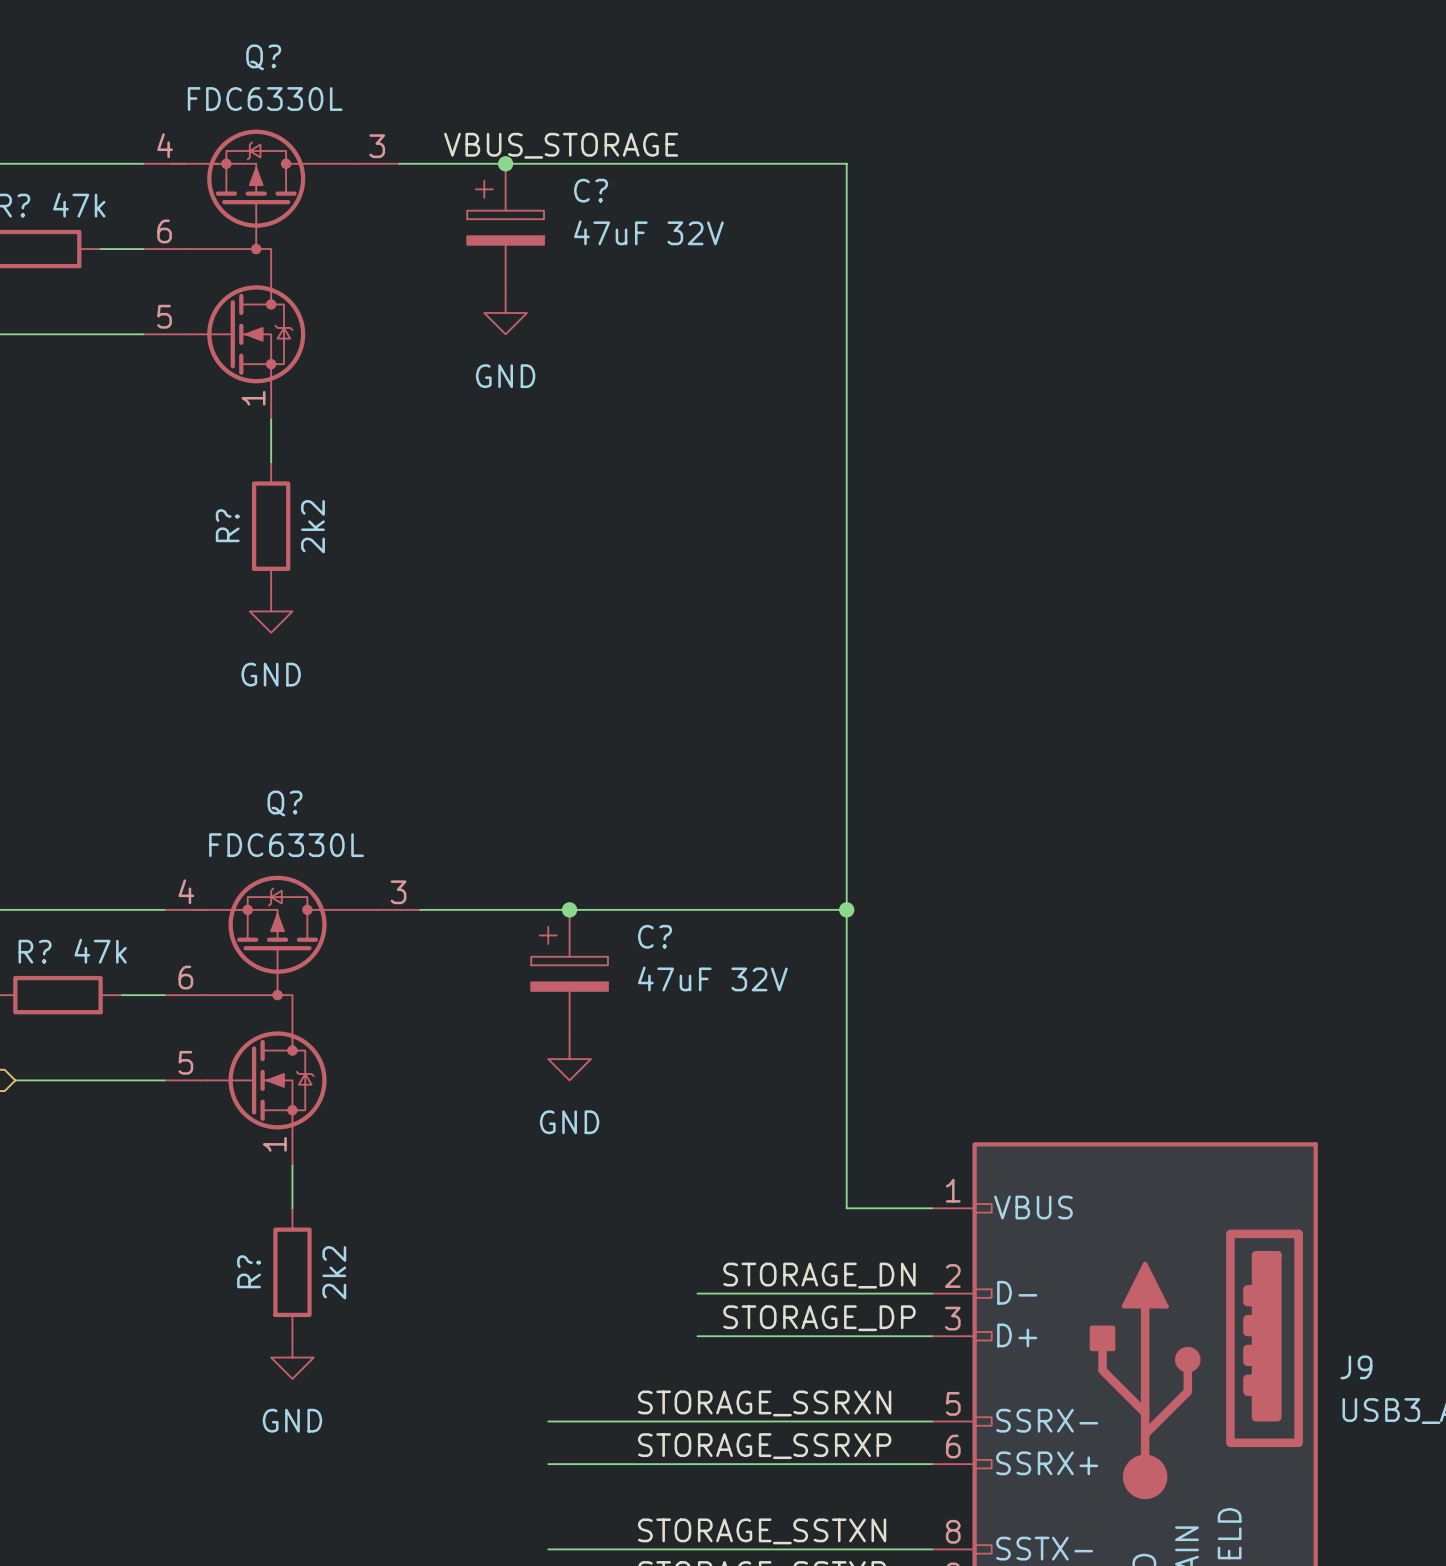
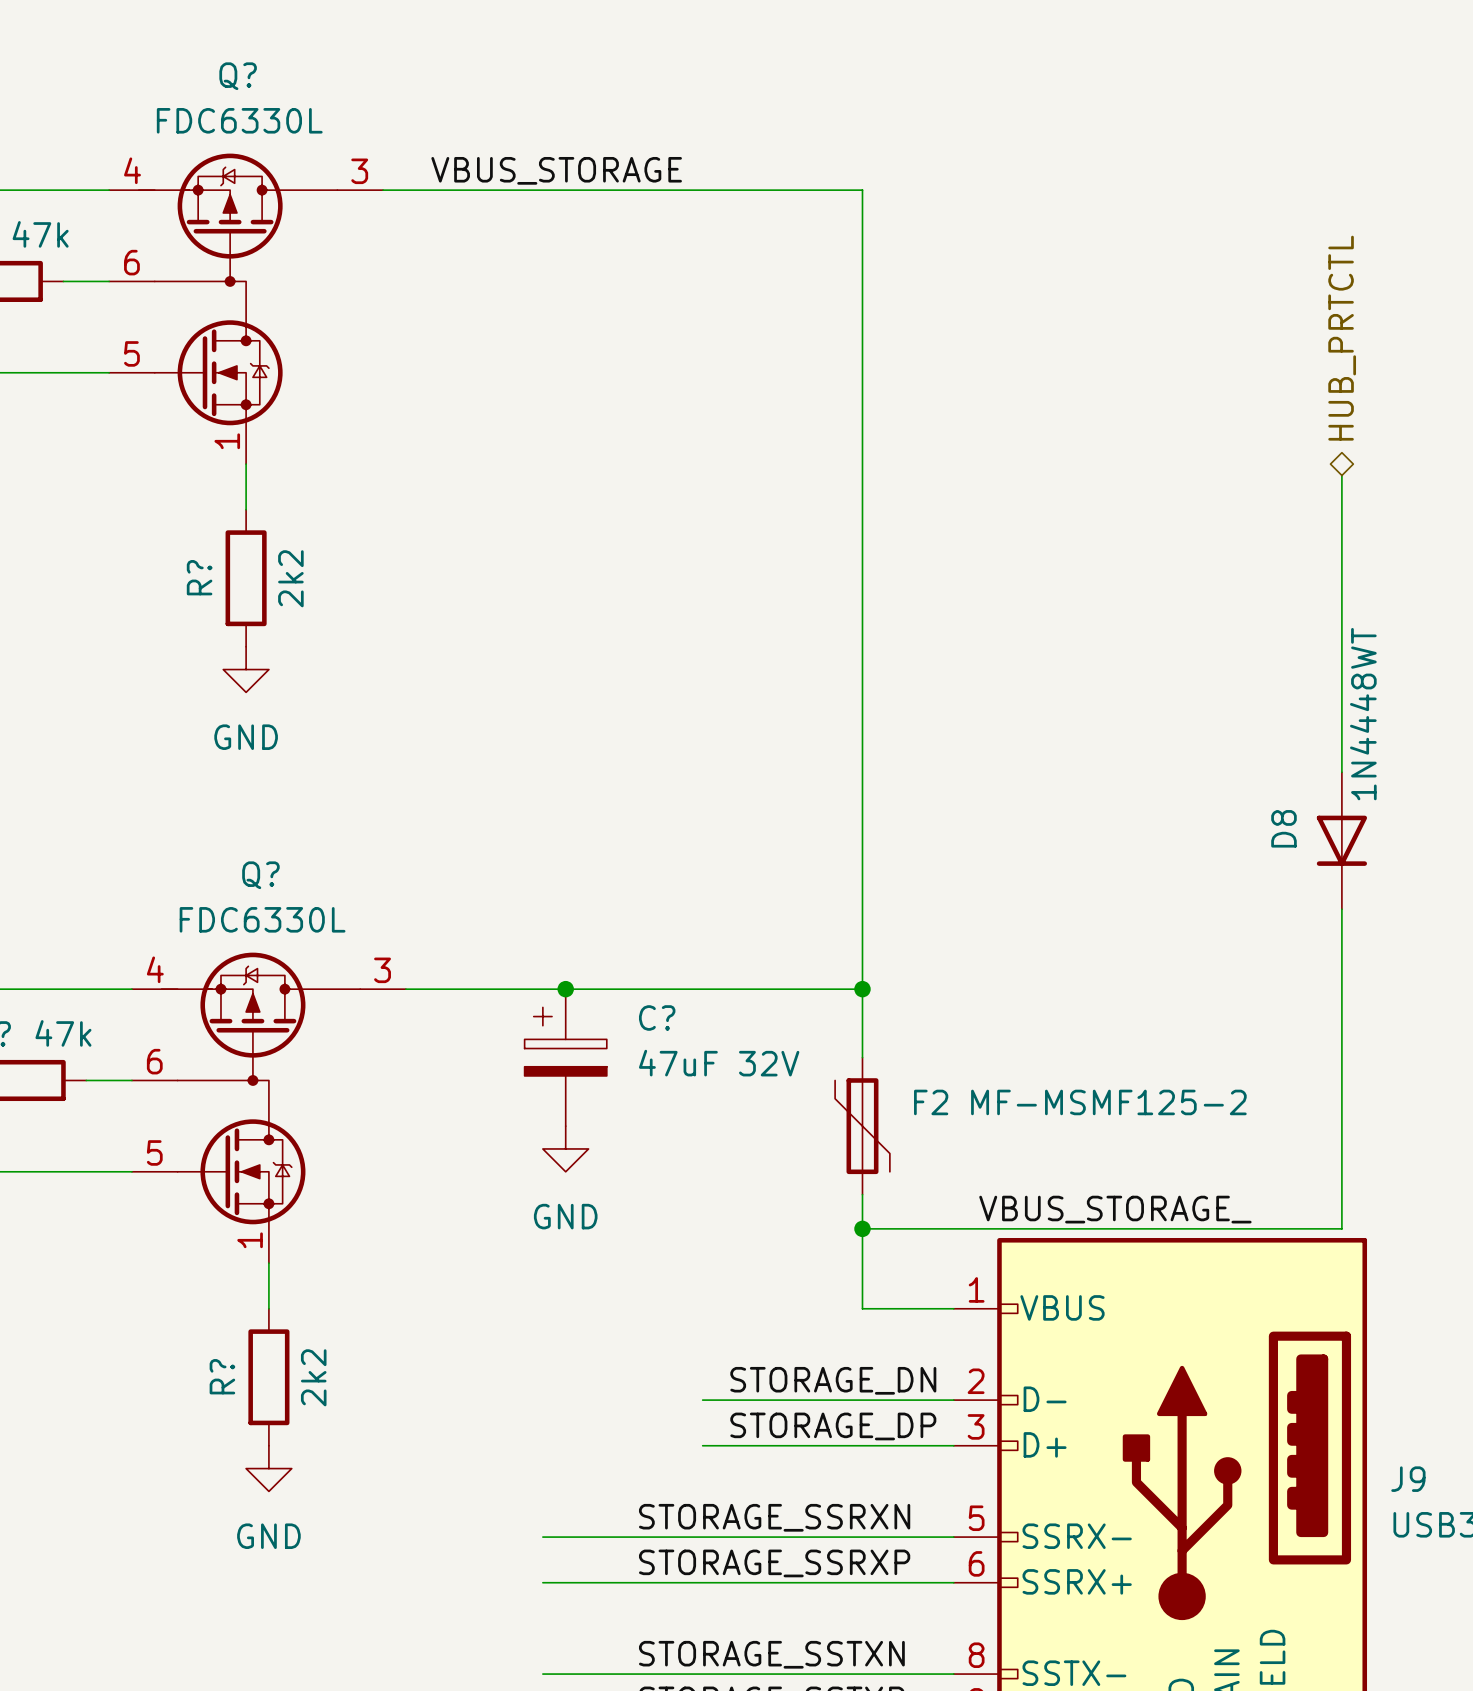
junction: (505, 163) -> none
C?: 47uF 32V (505, 227) -> none
hierarchical label: none -> HUB_PRTCTL (1342, 338)
power symbol: GND (505, 313) -> none
wire: none -> (1341, 475) (1341, 772)
D8: none -> 1N4448WT (1341, 840)
wire: none -> (1341, 909) (1341, 1228) (862, 1228)
F2: none -> MF-MSMF125-2 (862, 1126)
label: none -> VBUS_STORAGE_ (1115, 1209)
junction: none -> (862, 1228)

